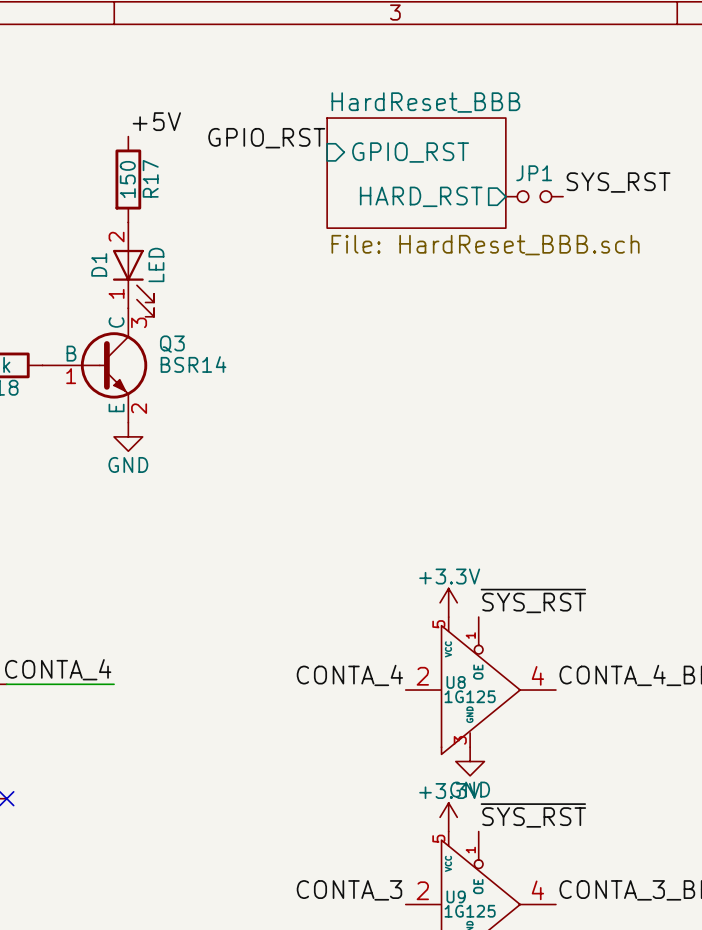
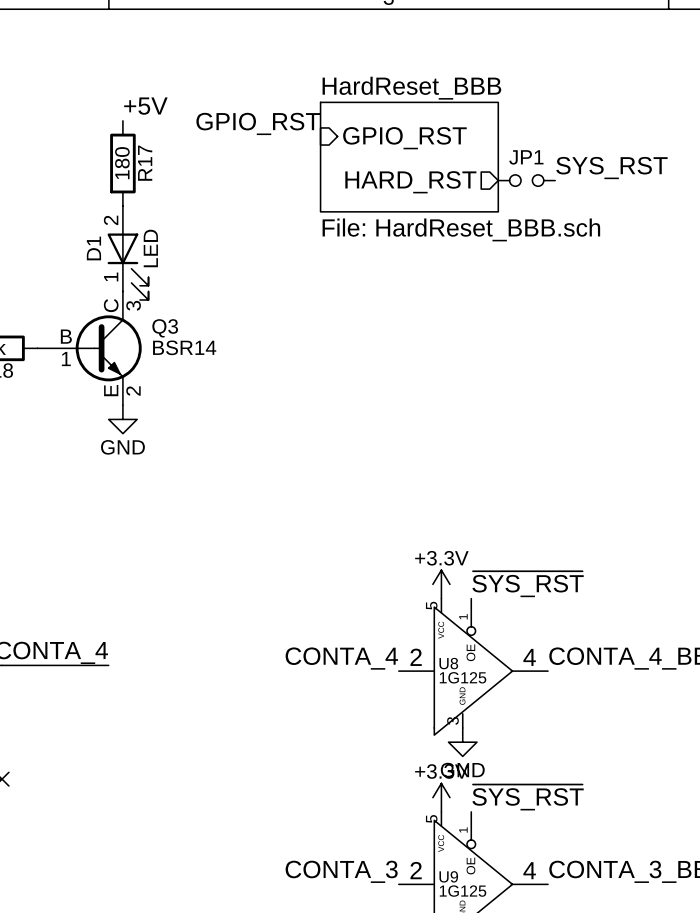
R17 value: 150 (127, 179) -> 180 (122, 163)

